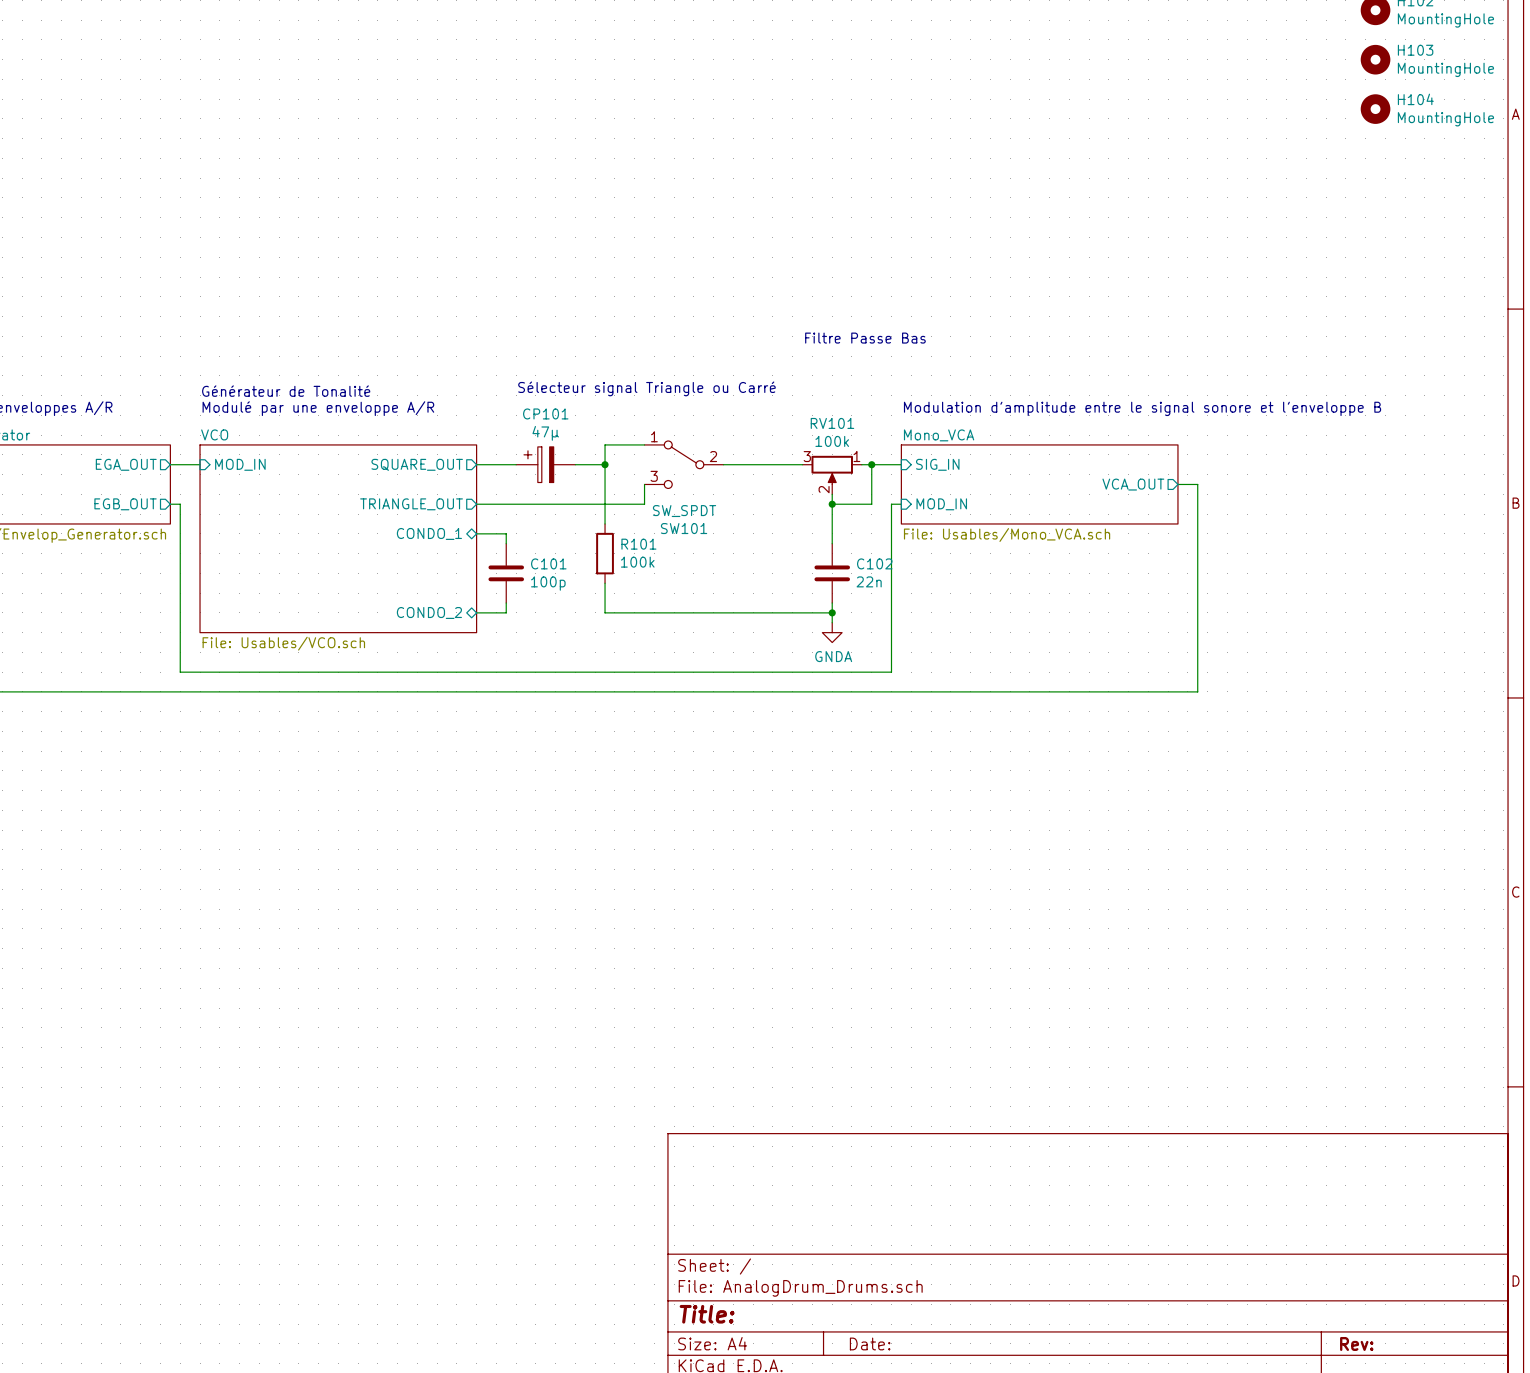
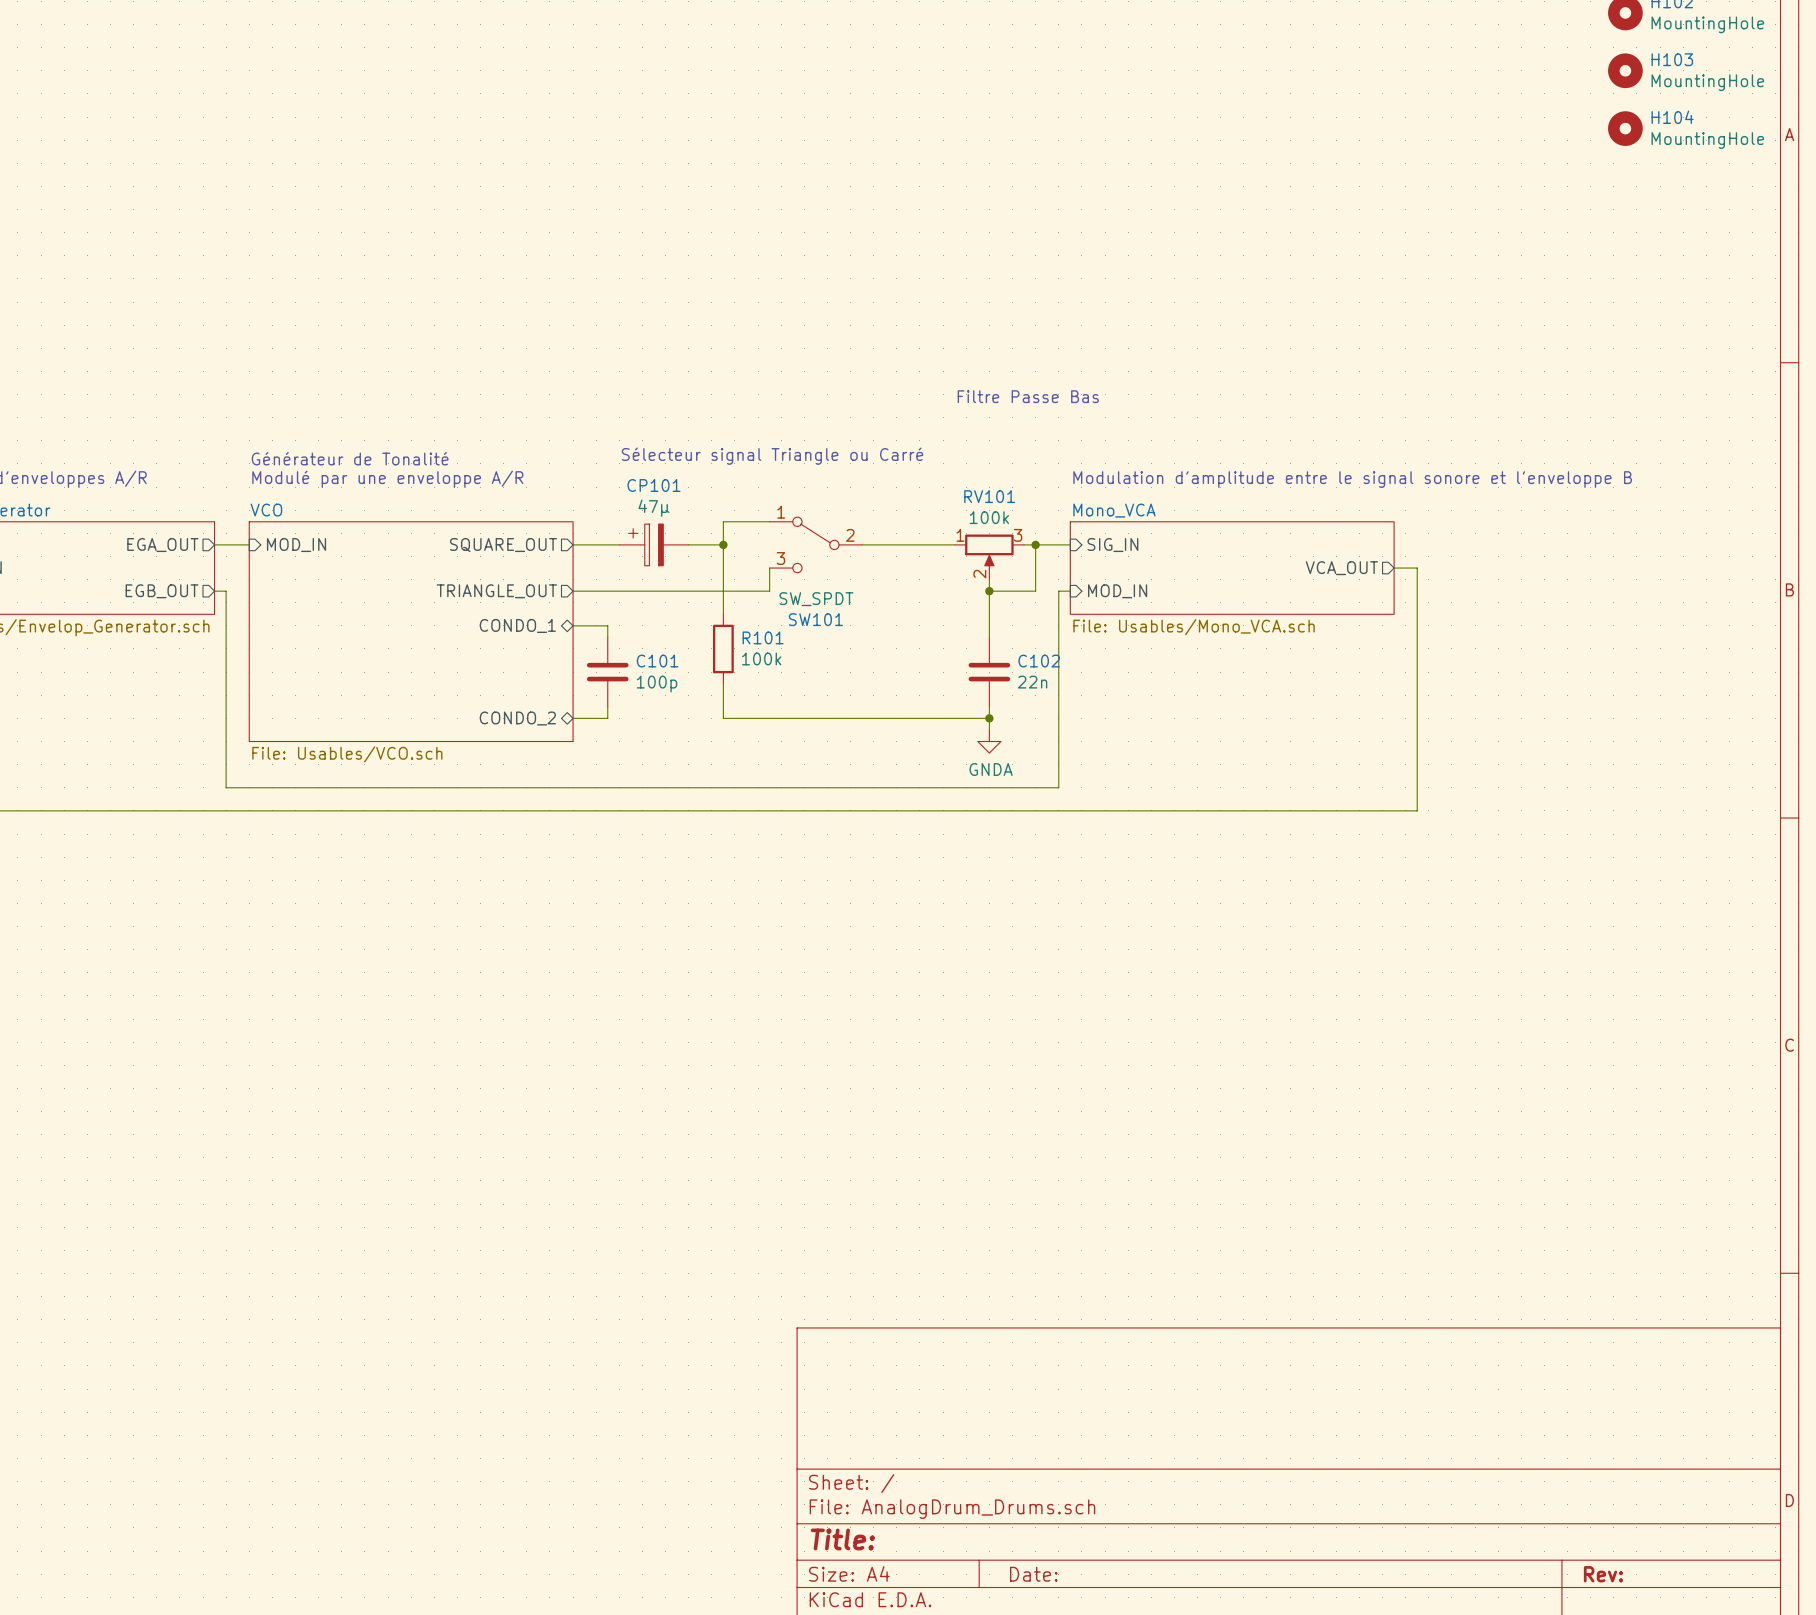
RV101 flip: as is (832, 470) -> left-right (989, 551)

